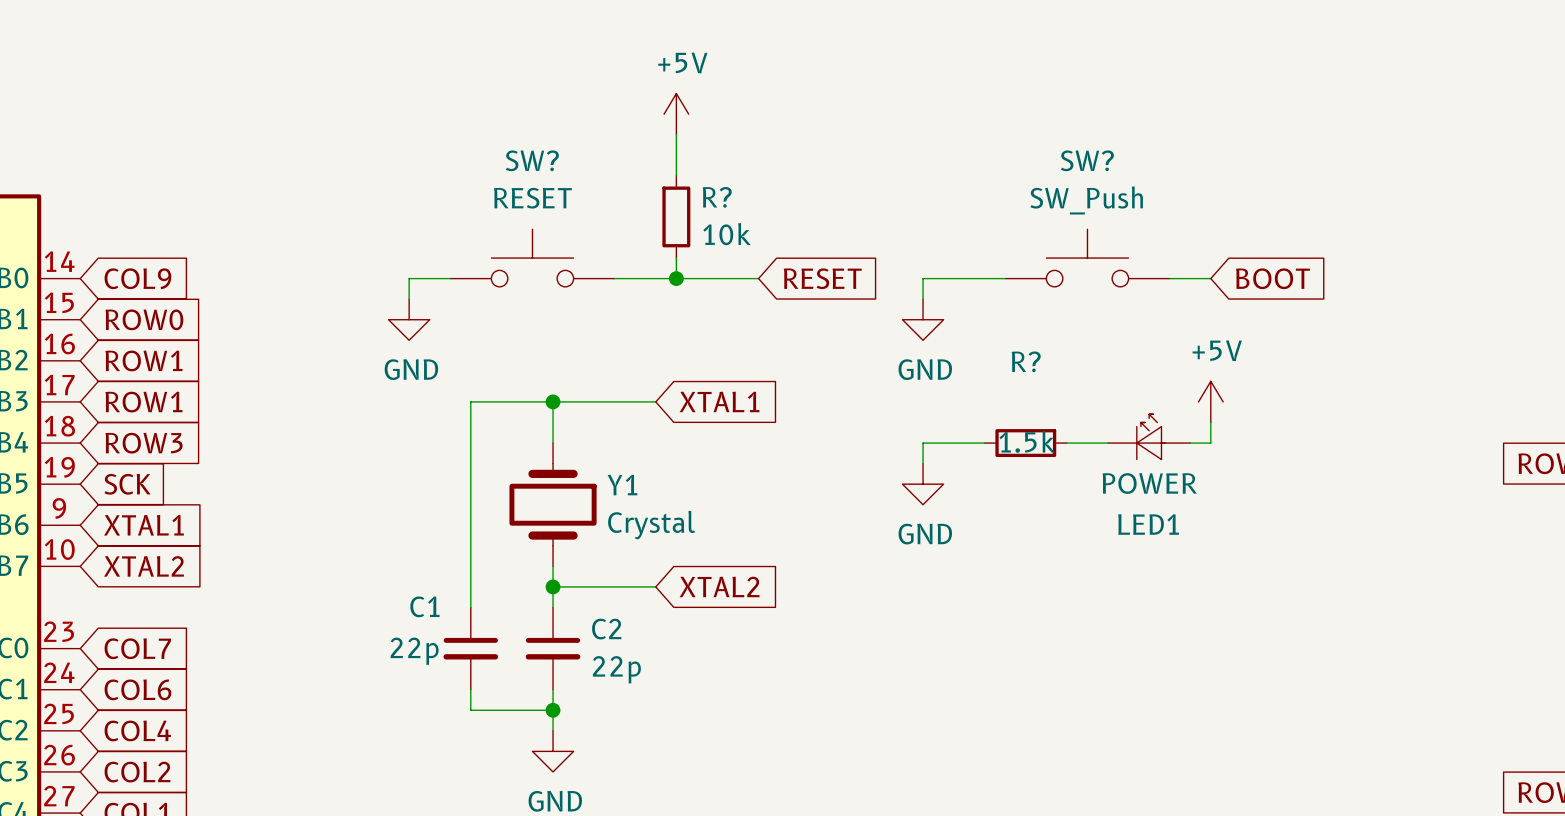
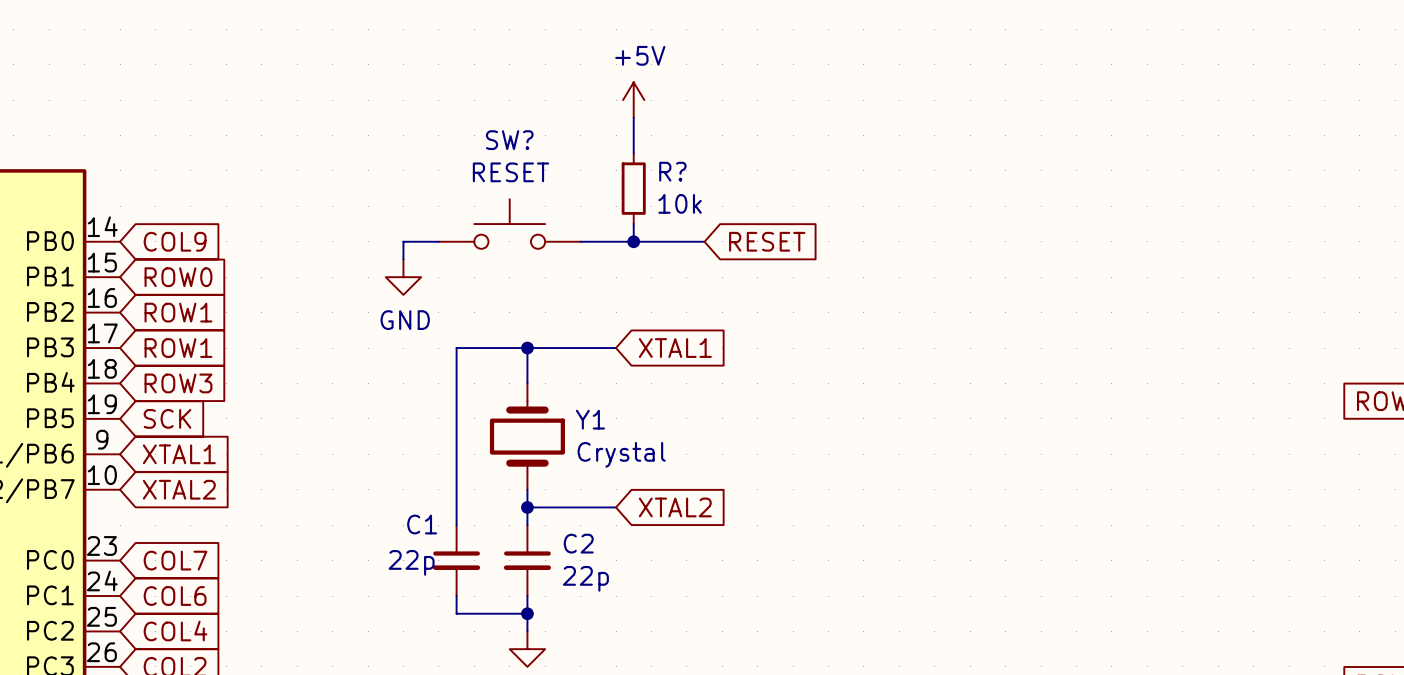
SW?: SW_Push (1087, 258) -> none
wire: (1005, 278) (923, 278) (923, 299) -> none
wire: (1169, 278) (1210, 278) -> none
global label: BOOT (1272, 278) -> none
power symbol: GND (923, 319) -> none
power symbol: +5V (1210, 401) -> none
wire: (1210, 422) (1210, 443) (1190, 443) -> none
LED1: POWER (1149, 436) -> none
wire: (984, 443) (923, 443) (923, 463) -> none
R?: 1.5k (1025, 443) -> none
wire: (1066, 443) (1108, 443) -> none
power symbol: GND (923, 484) -> none

